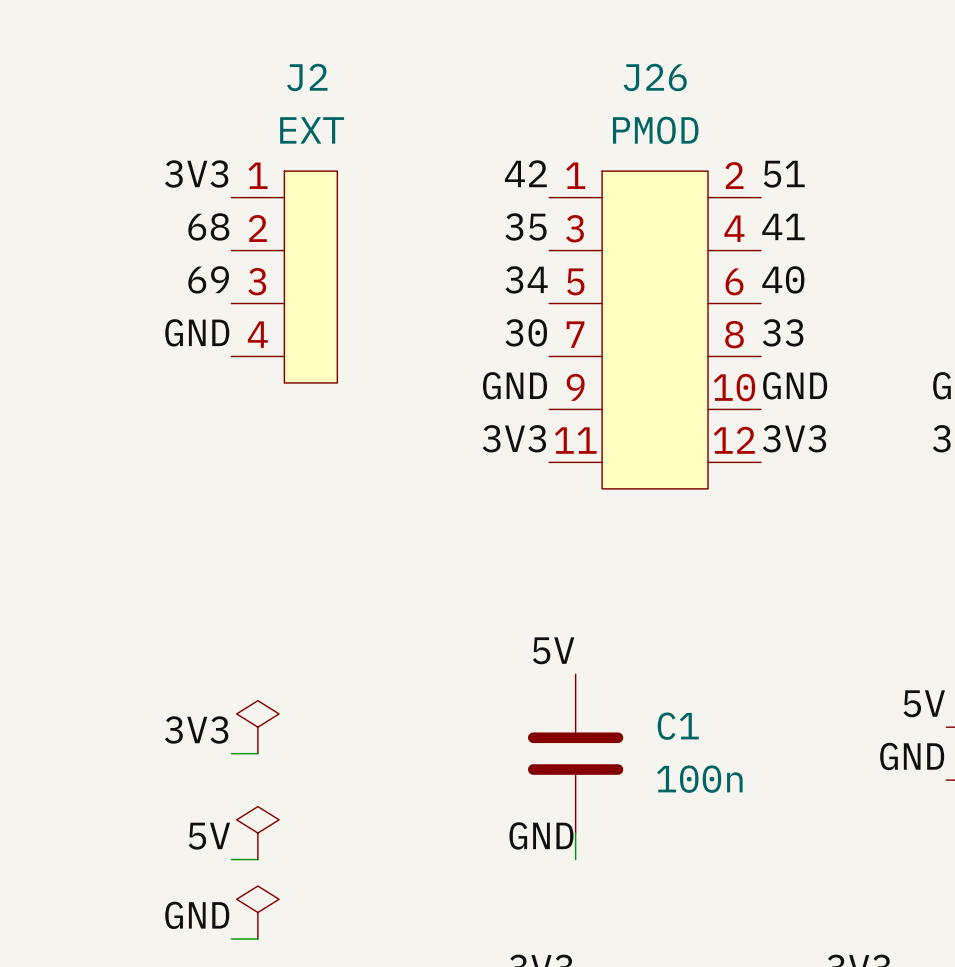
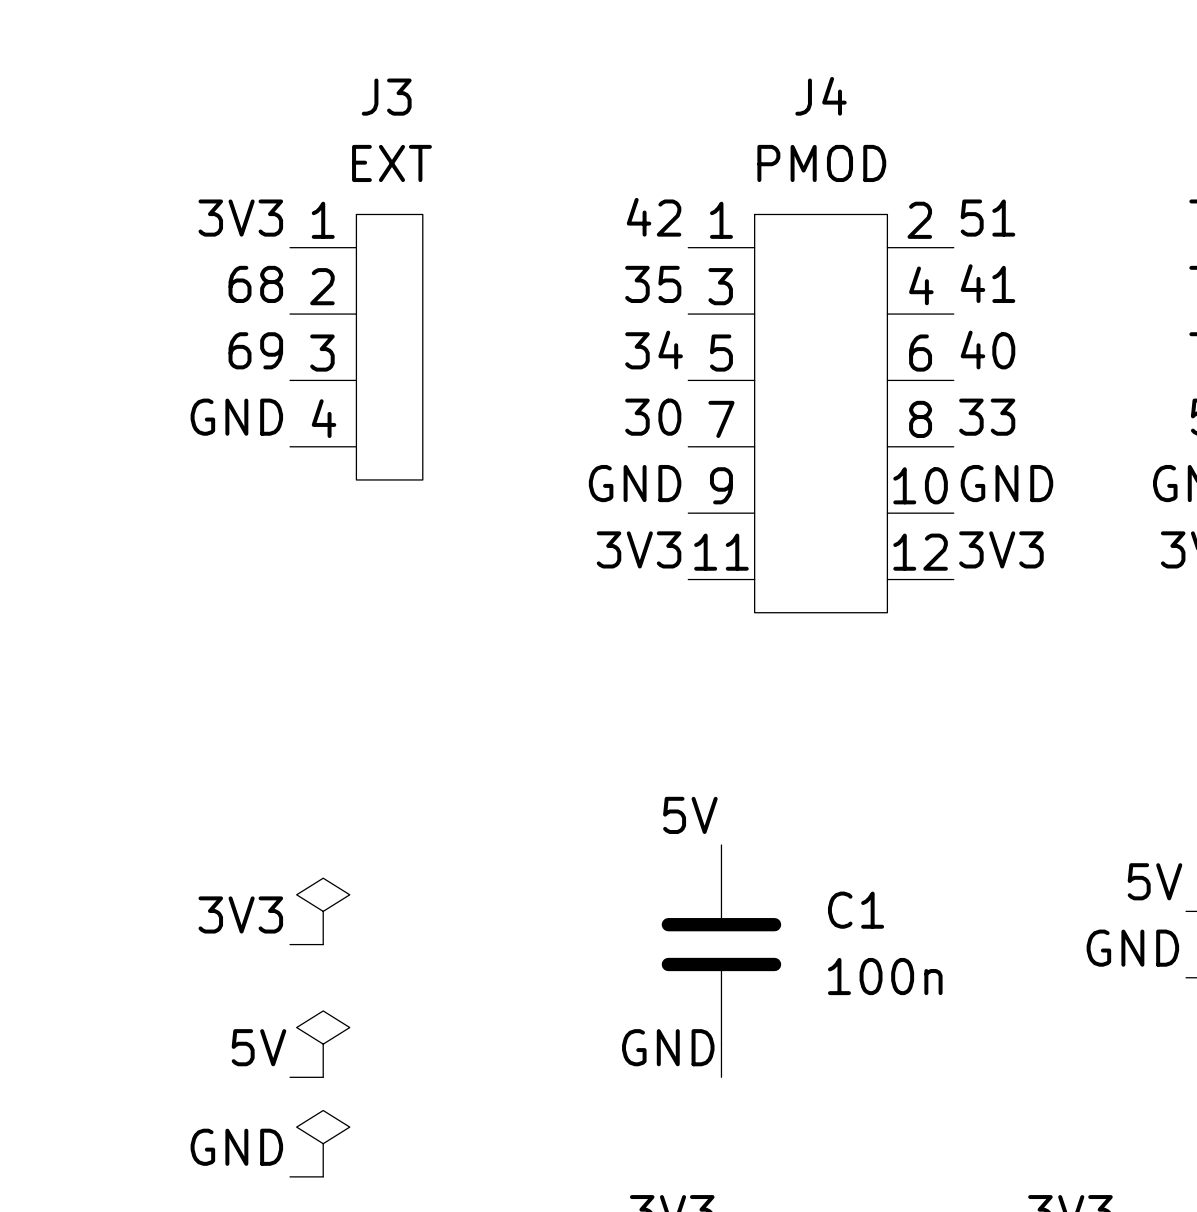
J2 name: J2 (307, 77) -> J3 (386, 97)
J26 name: J26 (655, 77) -> J4 (821, 96)

